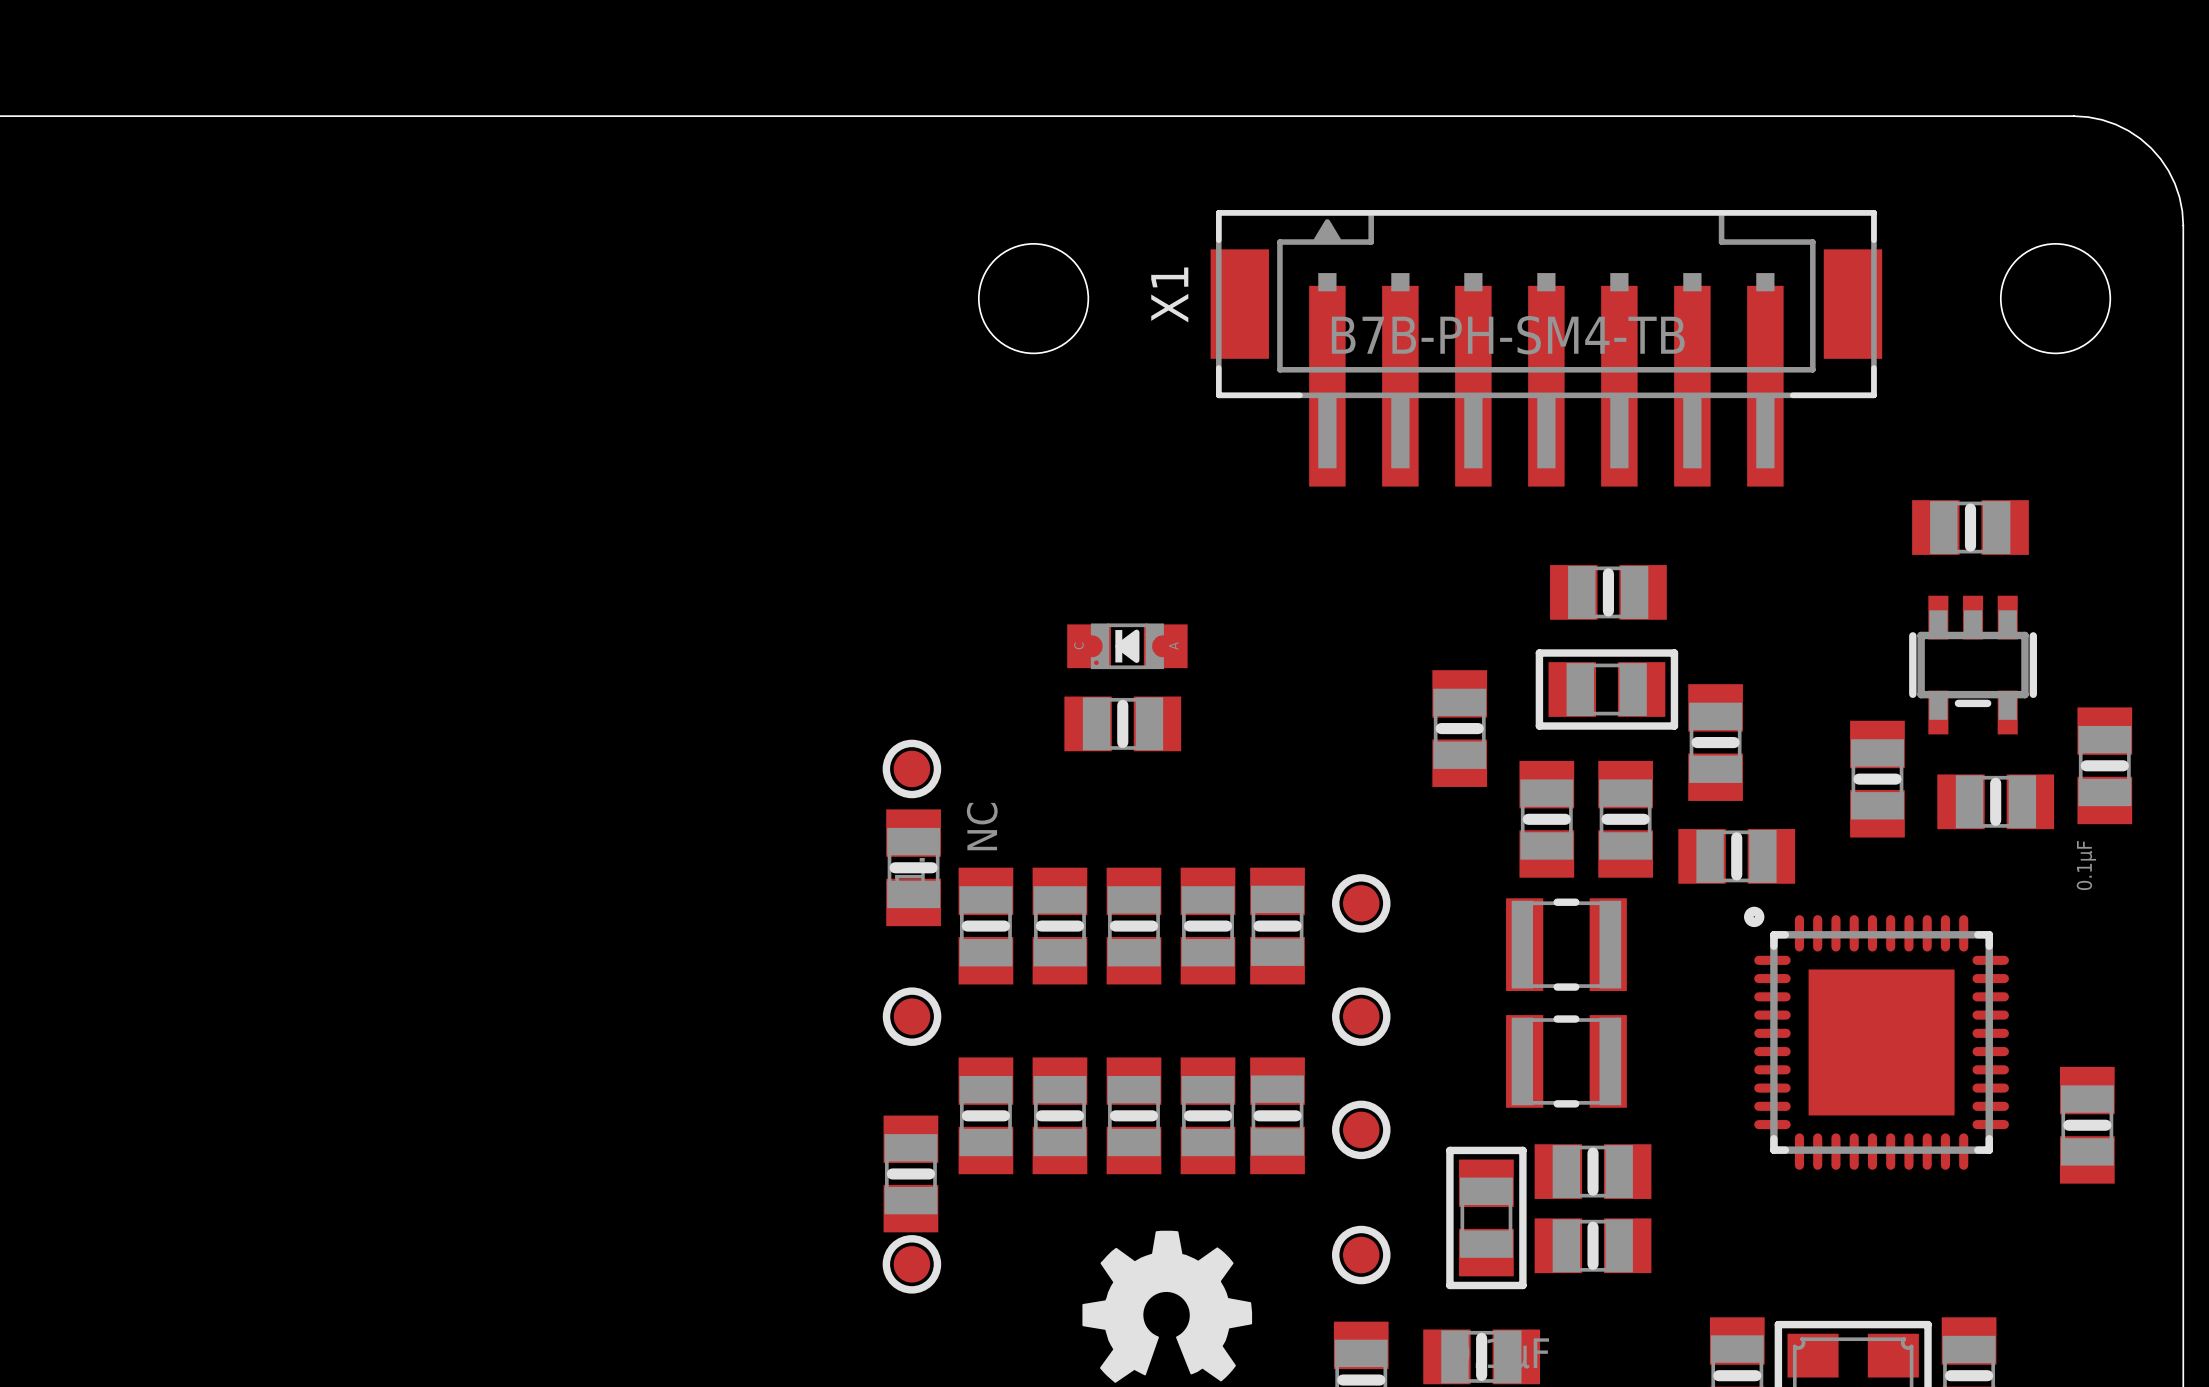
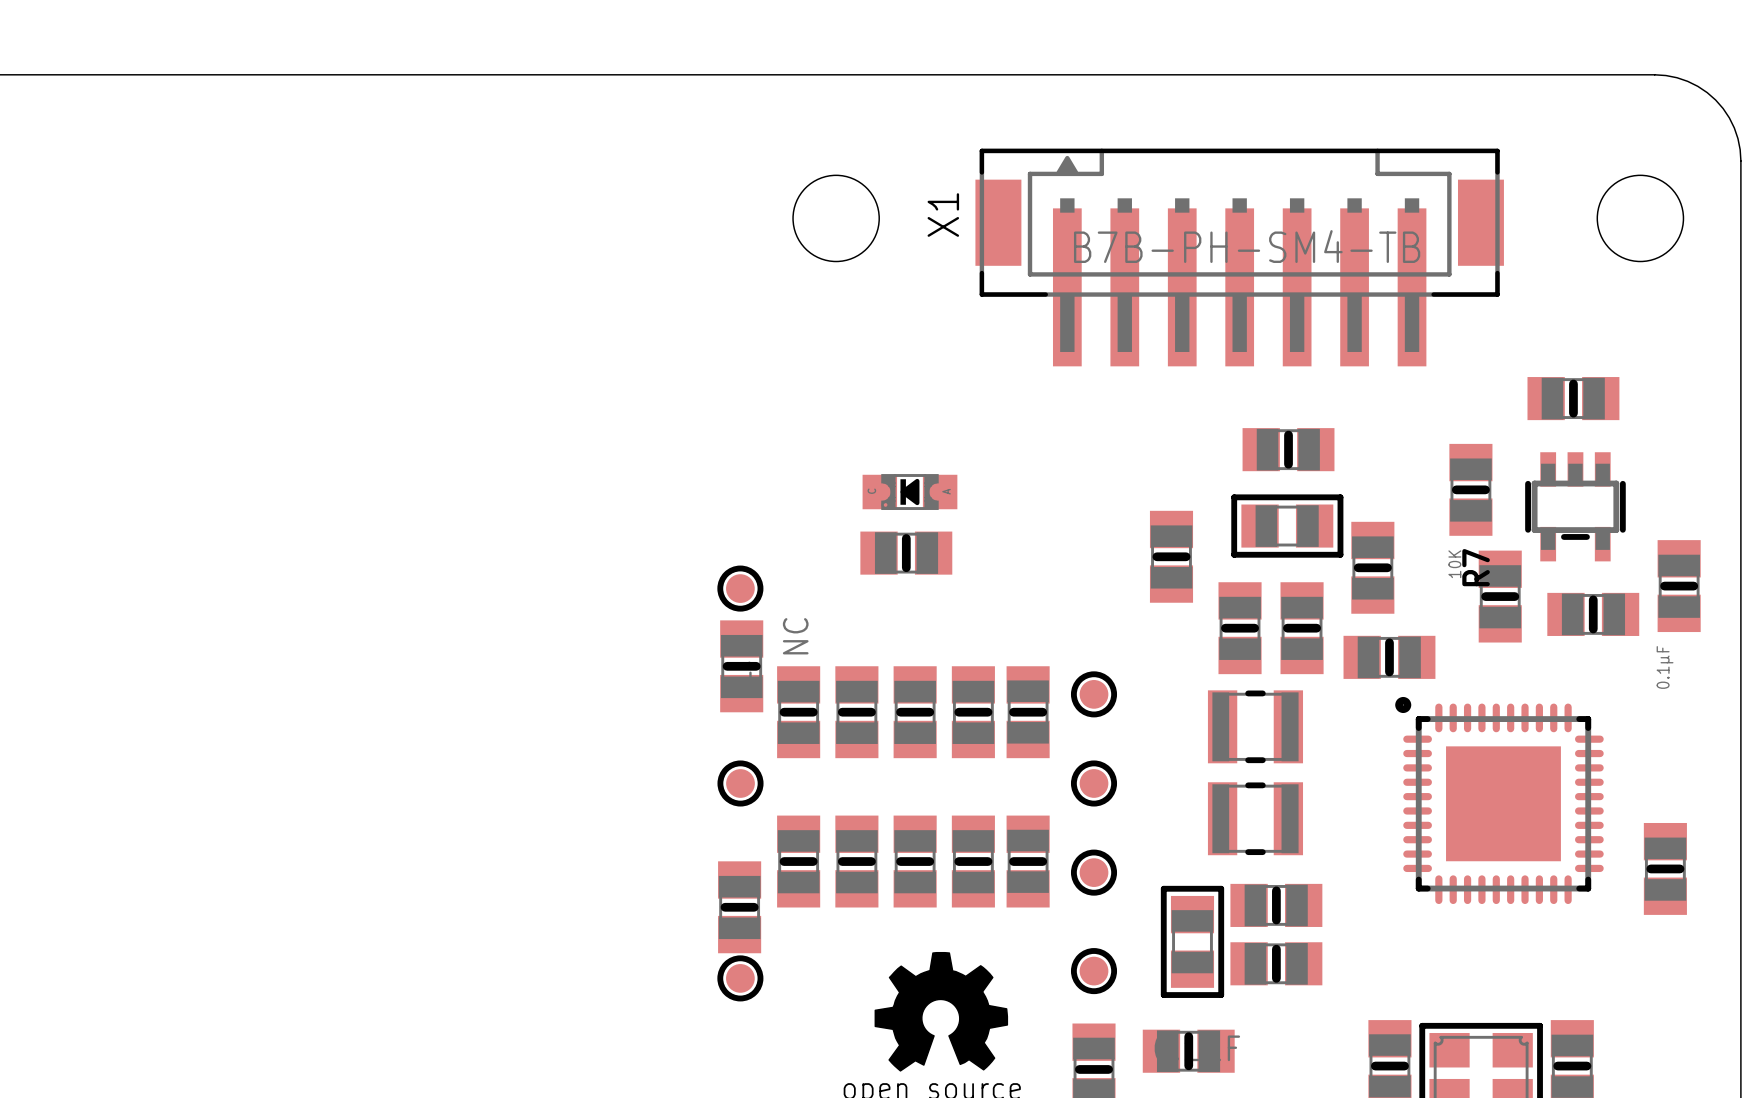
R7: none -> 10K (1470, 489)

